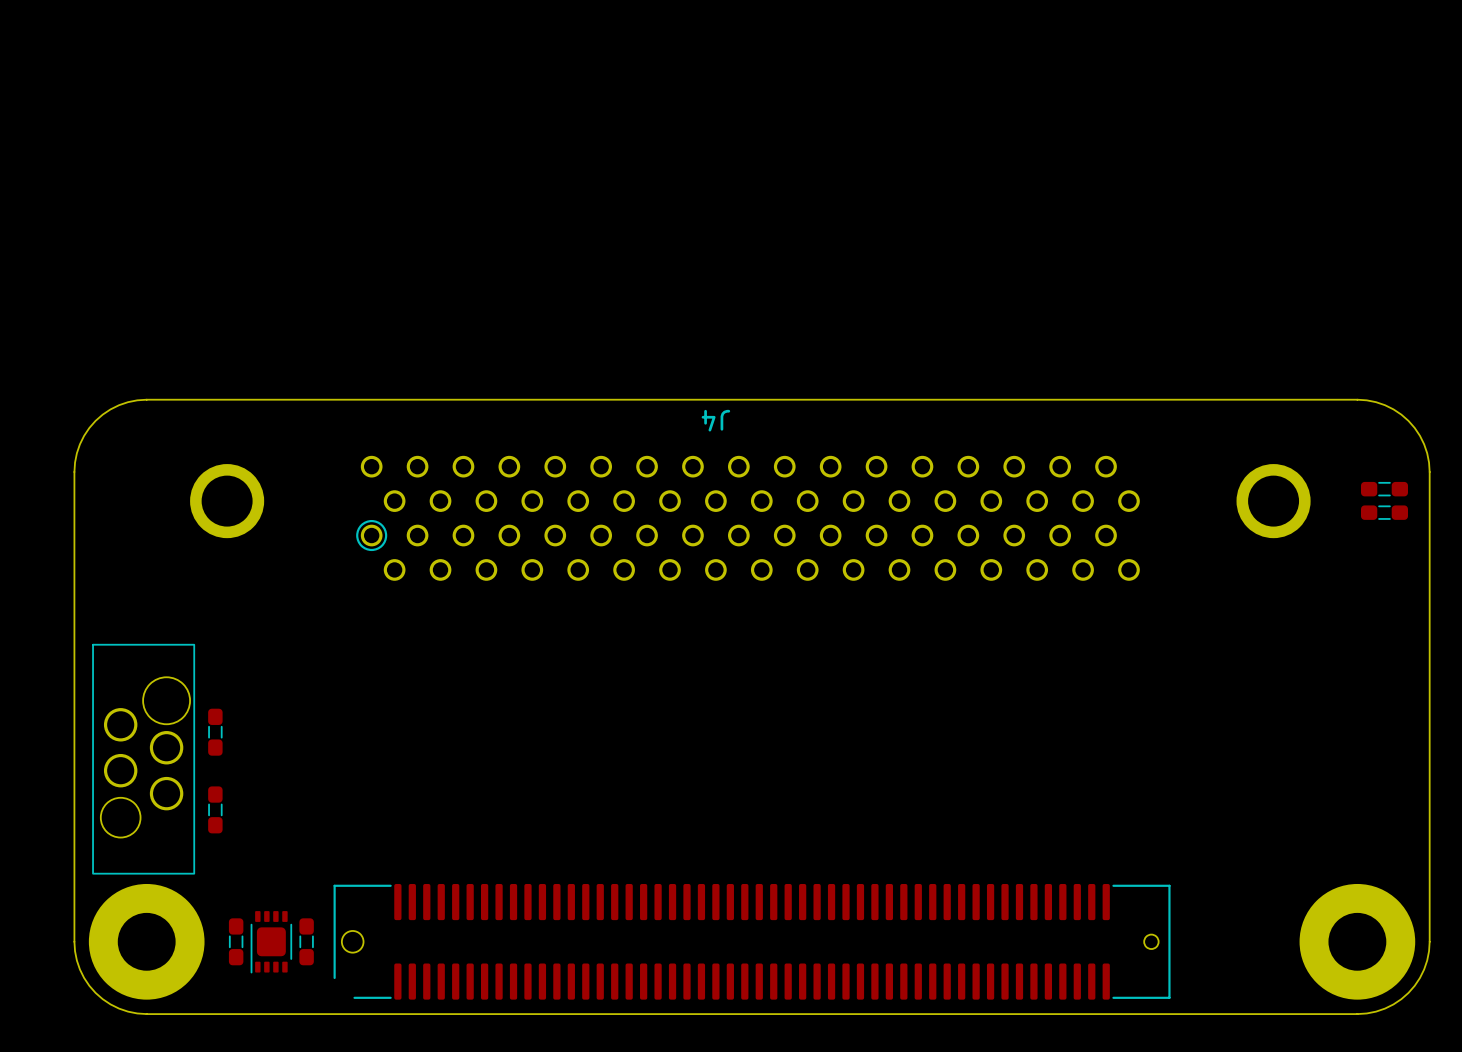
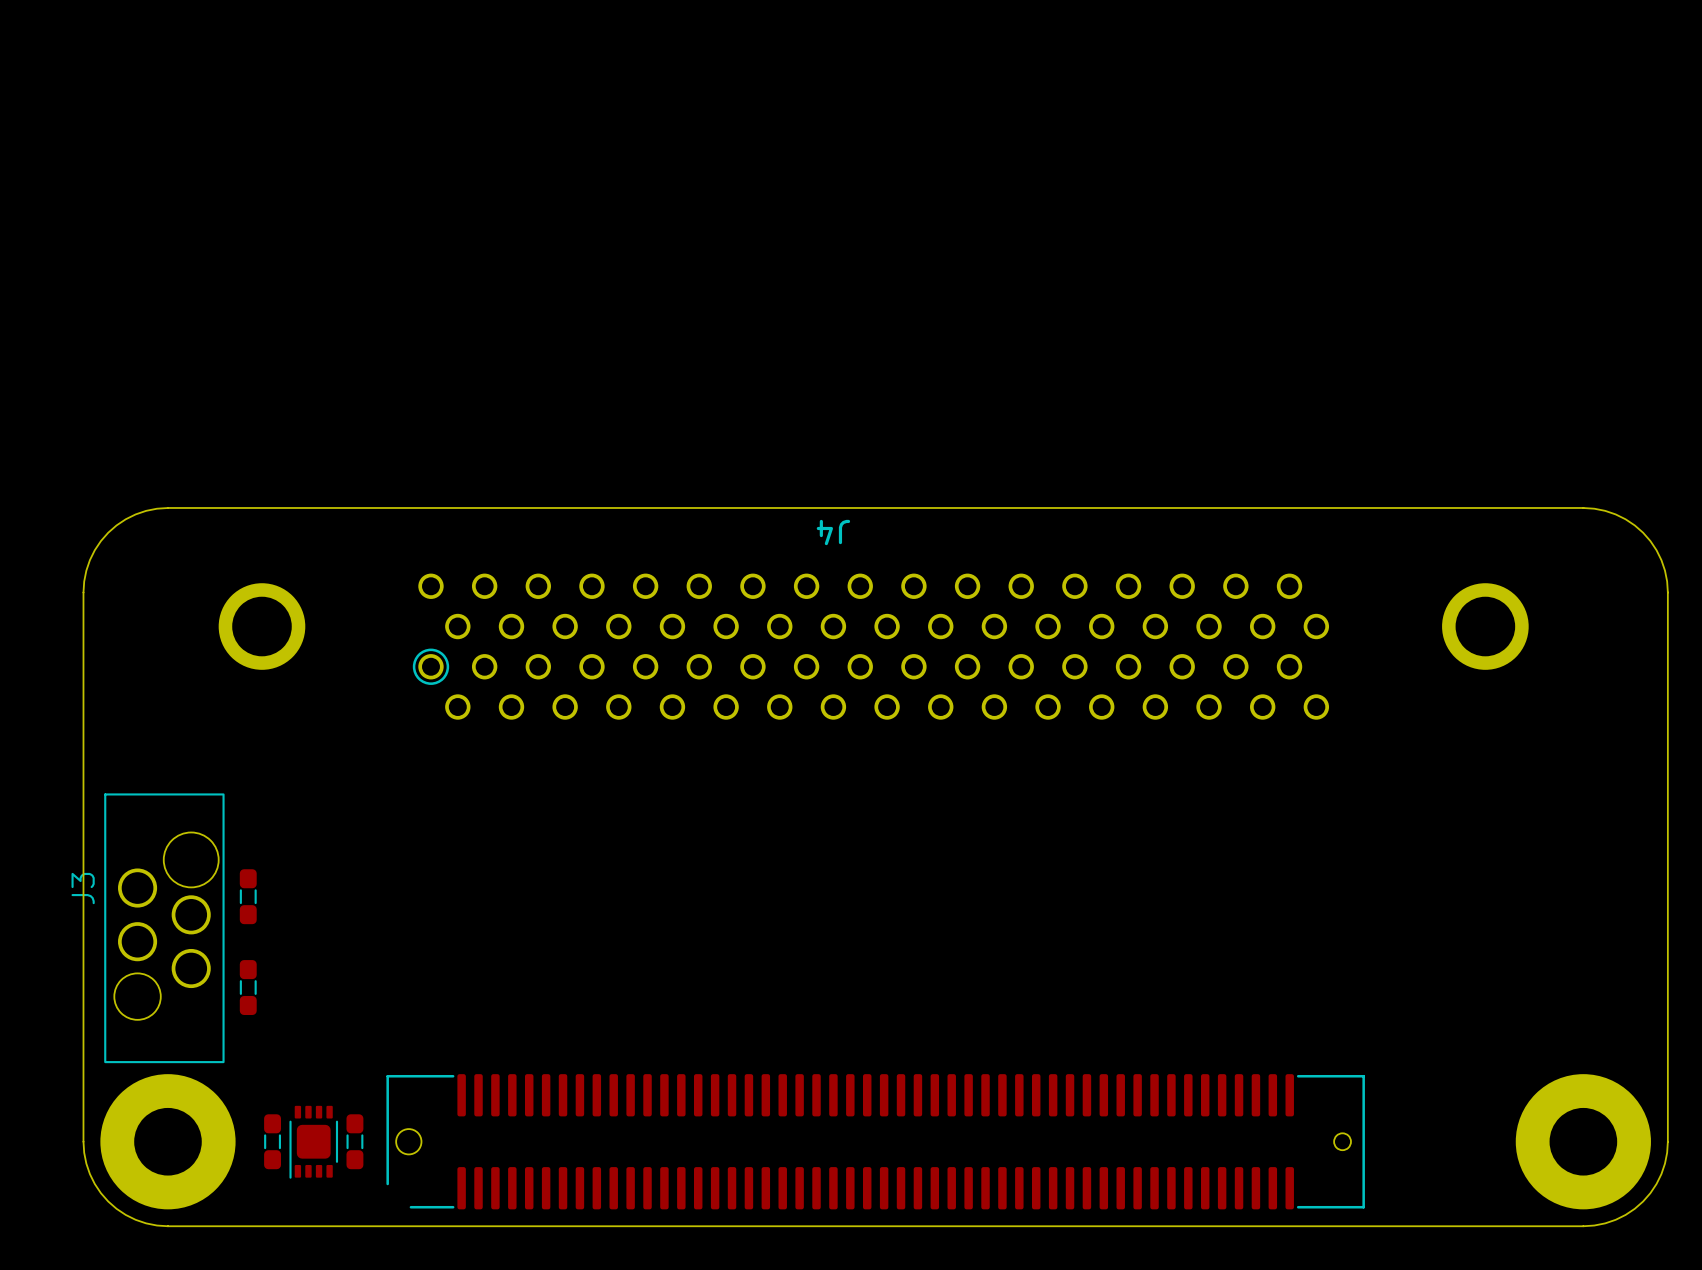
part: (1384, 489) -> none
part: (1384, 512) -> none
J3 name: none -> J3 (83, 888)

